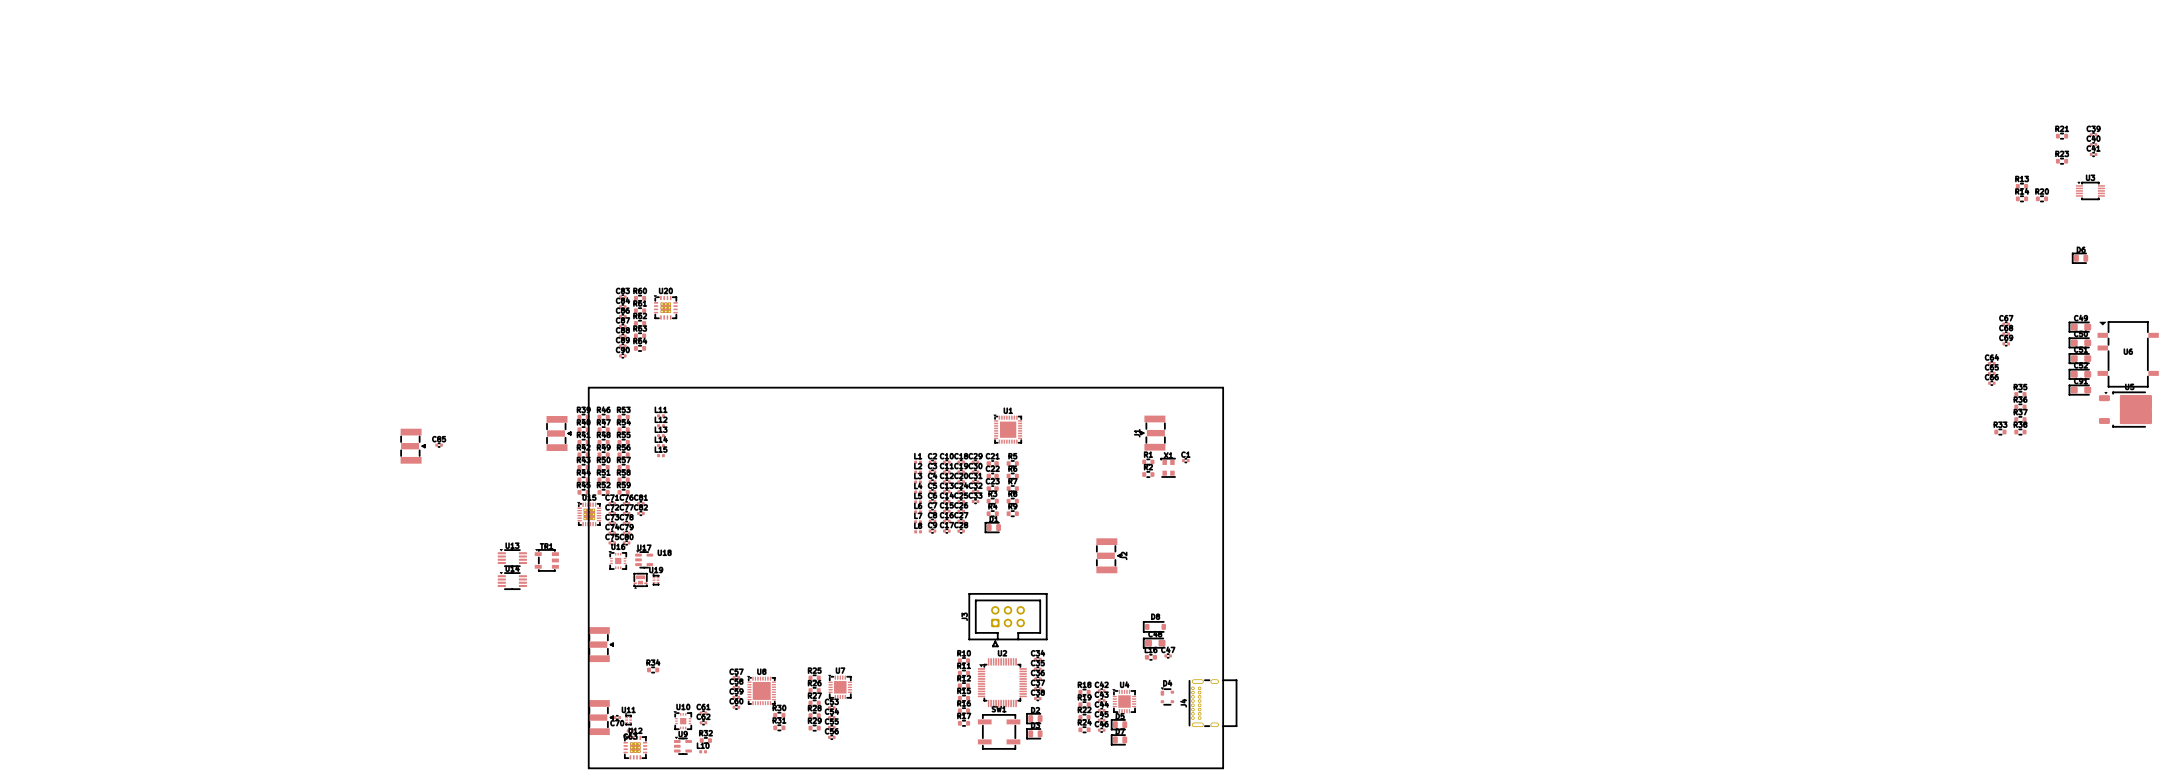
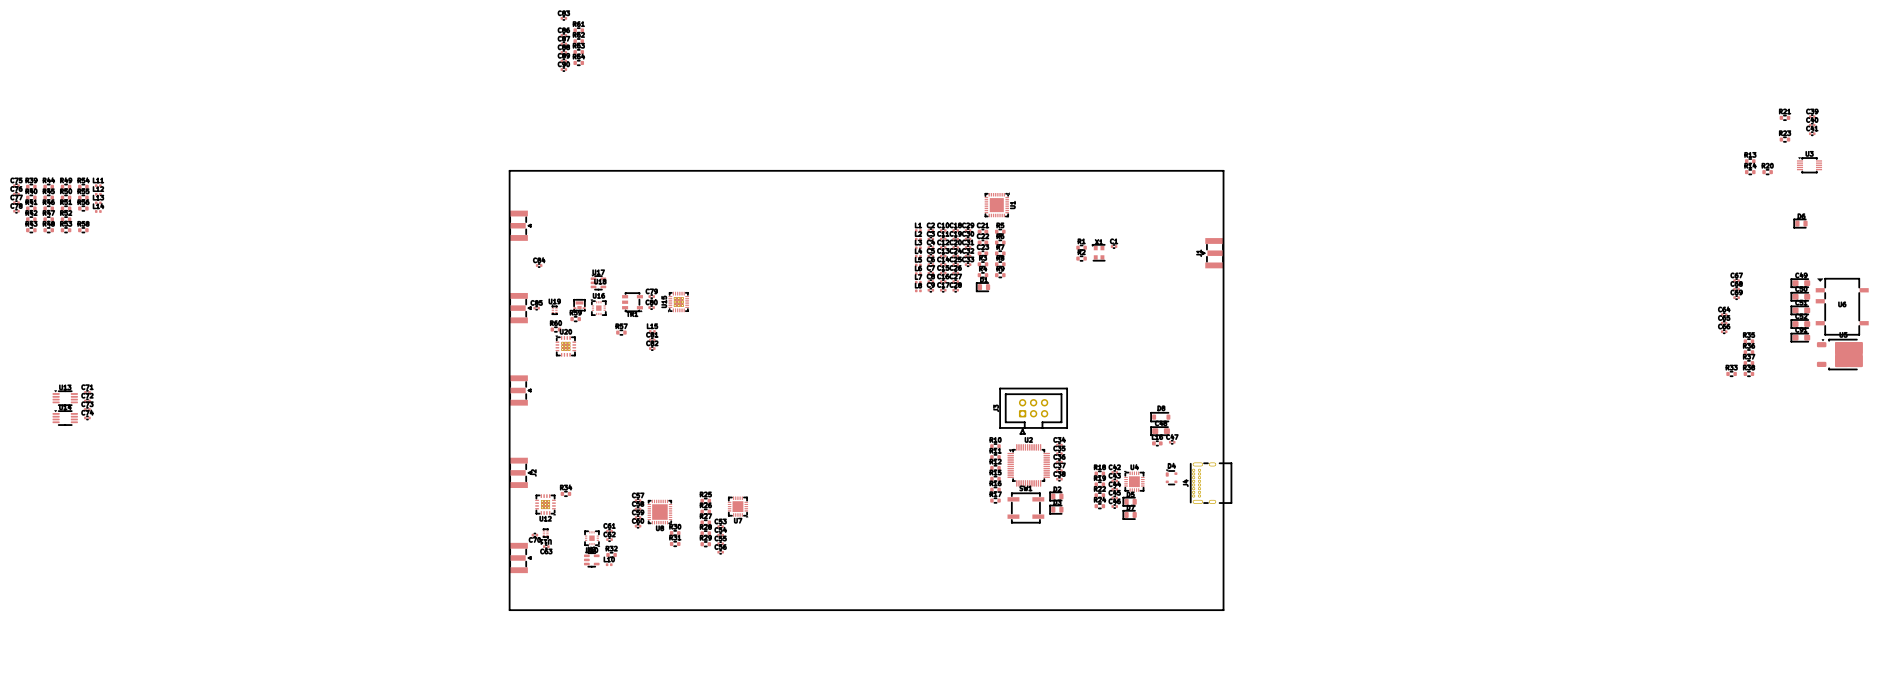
part: none -> (520, 225)
part position: (622, 296) -> (563, 18)
part position: (640, 298) -> (555, 329)
part position: (665, 307) -> (565, 346)
part position: (640, 310) -> (578, 30)
part position: (622, 316) -> (563, 35)
part position: (640, 323) -> (578, 41)
part position: (622, 326) -> (563, 43)
part position: (640, 335) -> (578, 52)
part position: (622, 336) -> (563, 52)
part position: (622, 346) -> (563, 60)
part position: (640, 348) -> (578, 62)
part: none -> (520, 308)
part position: (622, 355) -> (563, 69)
board edge: (588, 387) (1223, 387) (1223, 768) (588, 768) (588, 704) -> (509, 335) (509, 170) (1223, 170) (1223, 610) (509, 610)
part position: (660, 415) -> (98, 185)
part position: (583, 417) -> (31, 186)
part position: (603, 417) -> (48, 208)
part position: (623, 417) -> (66, 230)
part position: (660, 425) -> (98, 194)
part position: (583, 429) -> (31, 197)
part position: (603, 429) -> (48, 219)
part position: (623, 429) -> (83, 186)
part rotation: 0° (1007, 429) -> 90° clockwise (997, 204)
part position: (1007, 429) -> (997, 204)
part: (558, 433) -> none
part position: (1153, 433) -> (1212, 253)
part position: (660, 435) -> (98, 202)
part position: (583, 442) -> (31, 208)
part position: (603, 442) -> (48, 230)
part position: (623, 442) -> (83, 197)
part position: (439, 445) -> (536, 308)
part position: (660, 445) -> (98, 211)
part: (412, 446) -> none
part: none -> (520, 390)
part position: (583, 454) -> (31, 219)
part position: (603, 454) -> (66, 186)
part position: (623, 454) -> (83, 208)
part position: (660, 455) -> (652, 331)
part position: (1185, 460) -> (1114, 246)
part position: (1148, 461) -> (1081, 247)
part position: (918, 462) -> (918, 230)
part position: (932, 462) -> (930, 230)
part position: (946, 462) -> (943, 230)
part position: (961, 462) -> (955, 230)
part position: (975, 462) -> (968, 230)
part position: (992, 463) -> (982, 231)
part position: (1012, 463) -> (1000, 231)
part position: (583, 467) -> (31, 230)
part position: (603, 467) -> (66, 197)
part position: (623, 467) -> (621, 332)
part position: (1168, 467) -> (1098, 252)
part position: (918, 472) -> (918, 239)
part position: (932, 472) -> (930, 239)
part position: (946, 472) -> (943, 239)
part position: (961, 472) -> (955, 239)
part position: (975, 472) -> (968, 239)
part position: (1148, 474) -> (1081, 258)
part position: (992, 476) -> (982, 242)
part position: (1012, 476) -> (1000, 242)
part position: (583, 479) -> (48, 186)
part position: (603, 479) -> (66, 208)
part position: (623, 479) -> (83, 230)
part position: (932, 481) -> (930, 247)
part position: (946, 481) -> (943, 247)
part position: (961, 481) -> (955, 247)
part position: (975, 481) -> (968, 247)
part position: (918, 482) -> (918, 247)
part position: (992, 488) -> (982, 253)
part position: (1012, 488) -> (1000, 253)
part position: (932, 491) -> (930, 256)
part position: (946, 491) -> (943, 256)
part position: (961, 491) -> (955, 256)
part position: (975, 491) -> (968, 256)
part position: (583, 492) -> (48, 197)
part position: (603, 492) -> (66, 219)
part position: (623, 492) -> (575, 319)
part position: (918, 492) -> (918, 256)
part position: (932, 501) -> (930, 264)
part position: (946, 501) -> (943, 264)
part position: (961, 501) -> (955, 264)
part position: (975, 501) -> (968, 264)
part position: (992, 501) -> (982, 264)
part position: (1012, 501) -> (1000, 264)
part position: (918, 502) -> (918, 265)
part position: (612, 503) -> (87, 392)
part position: (626, 503) -> (16, 194)
part position: (640, 503) -> (652, 340)
part position: (918, 511) -> (918, 273)
part position: (932, 511) -> (930, 273)
part position: (946, 511) -> (943, 273)
part position: (961, 511) -> (955, 273)
part position: (612, 513) -> (87, 400)
part position: (626, 513) -> (16, 202)
part position: (640, 513) -> (652, 348)
part position: (992, 513) -> (982, 275)
part position: (1012, 513) -> (1000, 275)
part rotation: 0° (589, 514) -> 90° counterclockwise (678, 302)
part position: (589, 514) -> (678, 302)
part position: (918, 521) -> (918, 282)
part position: (932, 521) -> (930, 281)
part position: (946, 521) -> (943, 281)
part position: (961, 521) -> (955, 281)
part position: (612, 523) -> (87, 409)
part position: (626, 523) -> (16, 211)
part position: (993, 527) -> (983, 287)
part position: (918, 531) -> (918, 290)
part position: (932, 531) -> (930, 290)
part position: (946, 531) -> (943, 290)
part position: (961, 531) -> (955, 290)
part position: (612, 533) -> (87, 417)
part position: (626, 533) -> (651, 296)
part position: (612, 542) -> (16, 185)
part position: (626, 542) -> (651, 307)
part position: (1108, 555) -> (520, 472)
part position: (512, 557) -> (65, 397)
part position: (644, 559) -> (598, 282)
part rotation: 0° (546, 560) -> 180° (632, 302)
part position: (546, 560) -> (632, 302)
part position: (617, 560) -> (598, 307)
part position: (655, 579) -> (554, 309)
part position: (512, 580) -> (65, 417)
part position: (640, 581) -> (579, 306)
part position: (1008, 620) -> (1033, 411)
part position: (1154, 626) -> (1160, 417)
part position: (1154, 643) -> (1160, 431)
part position: (1168, 655) -> (1172, 442)
part position: (1150, 657) -> (1157, 443)
part position: (1037, 659) -> (1059, 445)
part position: (963, 660) -> (995, 446)
part position: (653, 669) -> (565, 493)
part position: (1037, 669) -> (1059, 453)
part position: (963, 673) -> (995, 457)
part position: (736, 677) -> (638, 500)
part position: (814, 677) -> (705, 500)
part position: (1037, 678) -> (1059, 462)
part position: (1002, 682) -> (1028, 465)
part position: (963, 685) -> (995, 468)
part rotation: 0° (840, 686) -> 180° (738, 506)
part position: (840, 686) -> (738, 506)
part position: (736, 687) -> (638, 509)
part position: (1037, 688) -> (1059, 470)
part rotation: 0° (761, 690) -> 180° (660, 512)
part position: (761, 690) -> (660, 512)
part position: (814, 690) -> (705, 511)
part position: (1101, 690) -> (1114, 472)
part position: (1084, 692) -> (1099, 473)
part position: (1167, 696) -> (1171, 477)
part position: (736, 697) -> (638, 517)
part position: (963, 698) -> (995, 478)
part position: (1037, 698) -> (1059, 479)
part position: (1101, 700) -> (1114, 480)
part position: (1124, 701) -> (1134, 481)
part position: (814, 703) -> (705, 522)
part position: (1213, 703) -> (1211, 483)
part position: (1084, 704) -> (1099, 484)
part position: (736, 707) -> (638, 526)
part position: (831, 707) -> (720, 526)
part position: (963, 710) -> (995, 489)
part position: (1101, 710) -> (1114, 489)
part position: (703, 712) -> (609, 531)
part position: (779, 715) -> (675, 533)
part position: (814, 715) -> (705, 533)
part: (601, 717) -> none
part position: (617, 717) -> (534, 535)
part position: (831, 717) -> (720, 535)
part position: (1084, 717) -> (1099, 495)
part position: (1034, 718) -> (1056, 496)
part rotation: 0° (628, 719) -> 180° (545, 534)
part position: (628, 719) -> (545, 534)
part rotation: 0° (682, 720) -> 180° (592, 538)
part position: (682, 720) -> (592, 538)
part position: (1101, 720) -> (1114, 498)
part position: (703, 722) -> (609, 539)
part position: (963, 723) -> (995, 500)
part position: (1119, 724) -> (1129, 501)
part position: (779, 727) -> (675, 543)
part position: (831, 727) -> (720, 543)
part position: (814, 728) -> (705, 544)
part position: (1084, 729) -> (1099, 506)
part position: (630, 730) -> (546, 546)
part position: (1101, 730) -> (1114, 506)
part position: (999, 731) -> (1025, 508)
part position: (1034, 733) -> (1056, 509)
part position: (831, 737) -> (720, 552)
part position: (1119, 739) -> (1129, 514)
part position: (705, 740) -> (611, 554)
part position: (682, 745) -> (591, 559)
part rotation: 0° (635, 747) -> 180° (545, 504)
part position: (635, 747) -> (545, 504)
part position: (703, 751) -> (609, 564)

